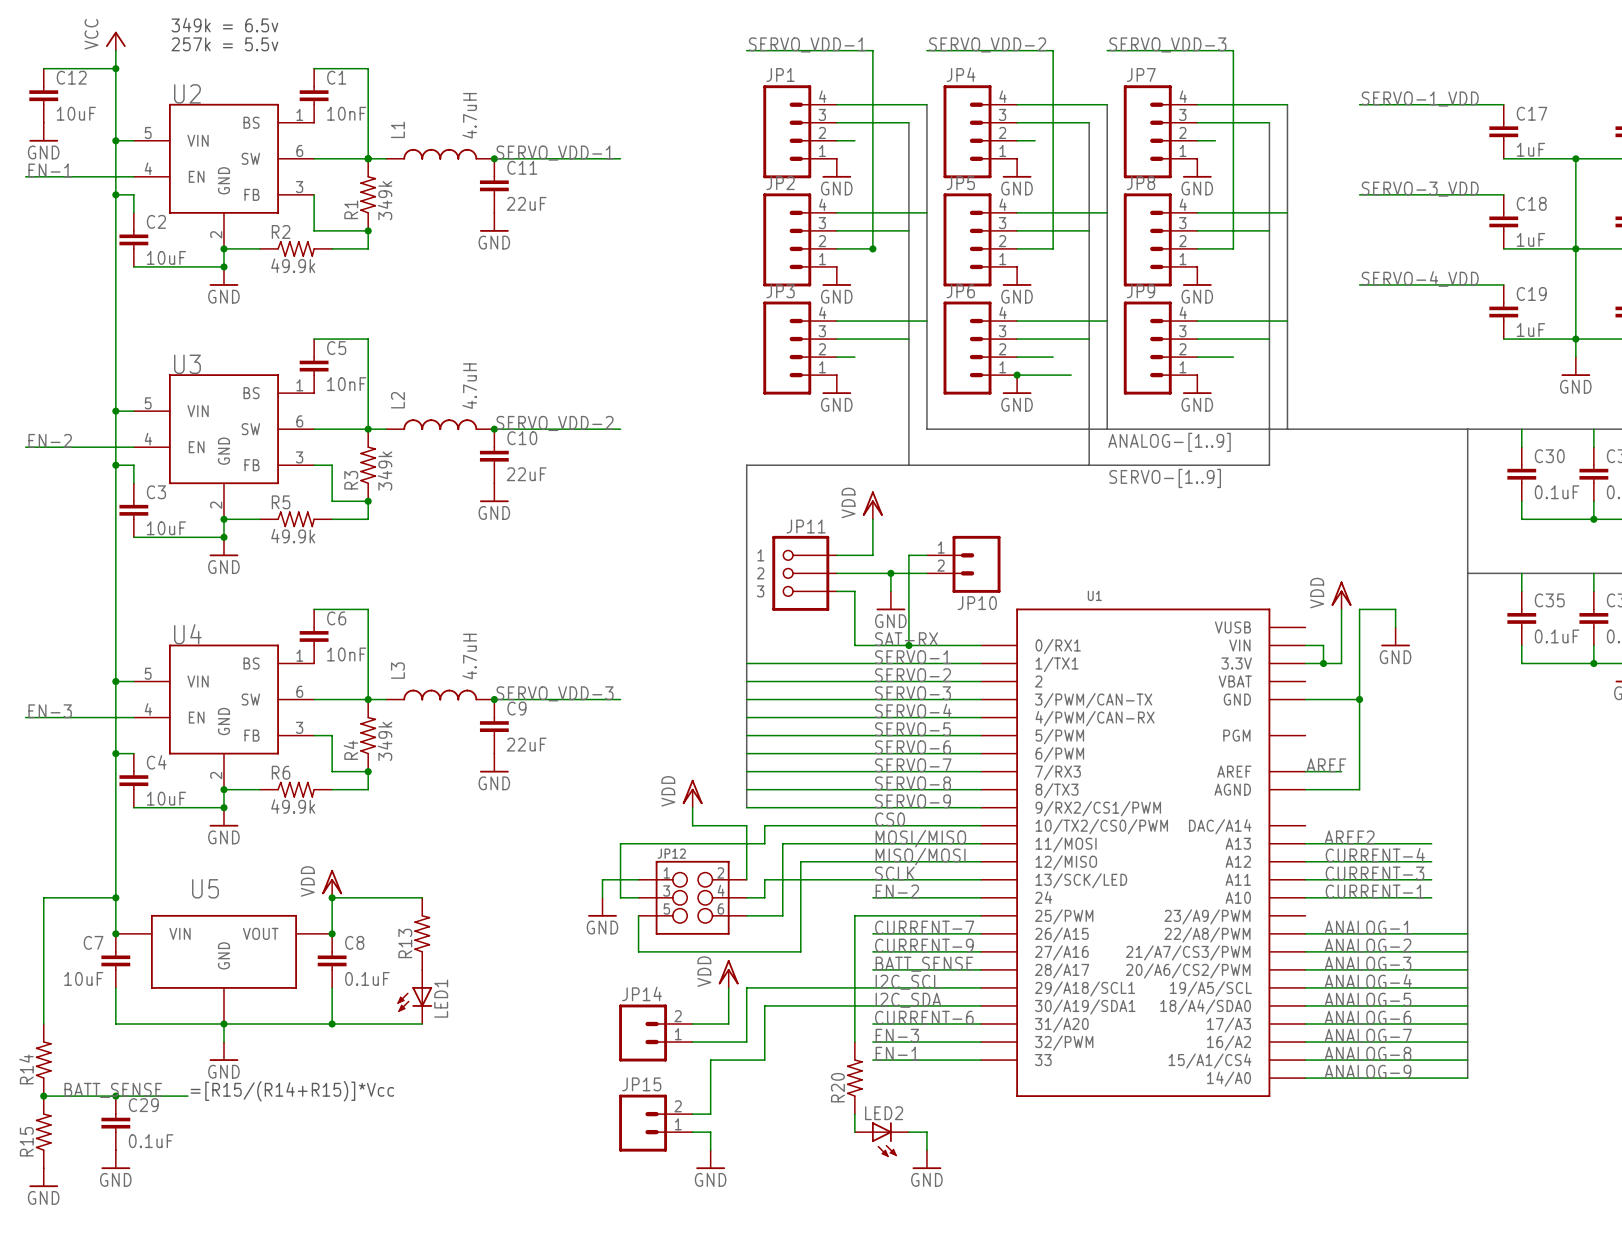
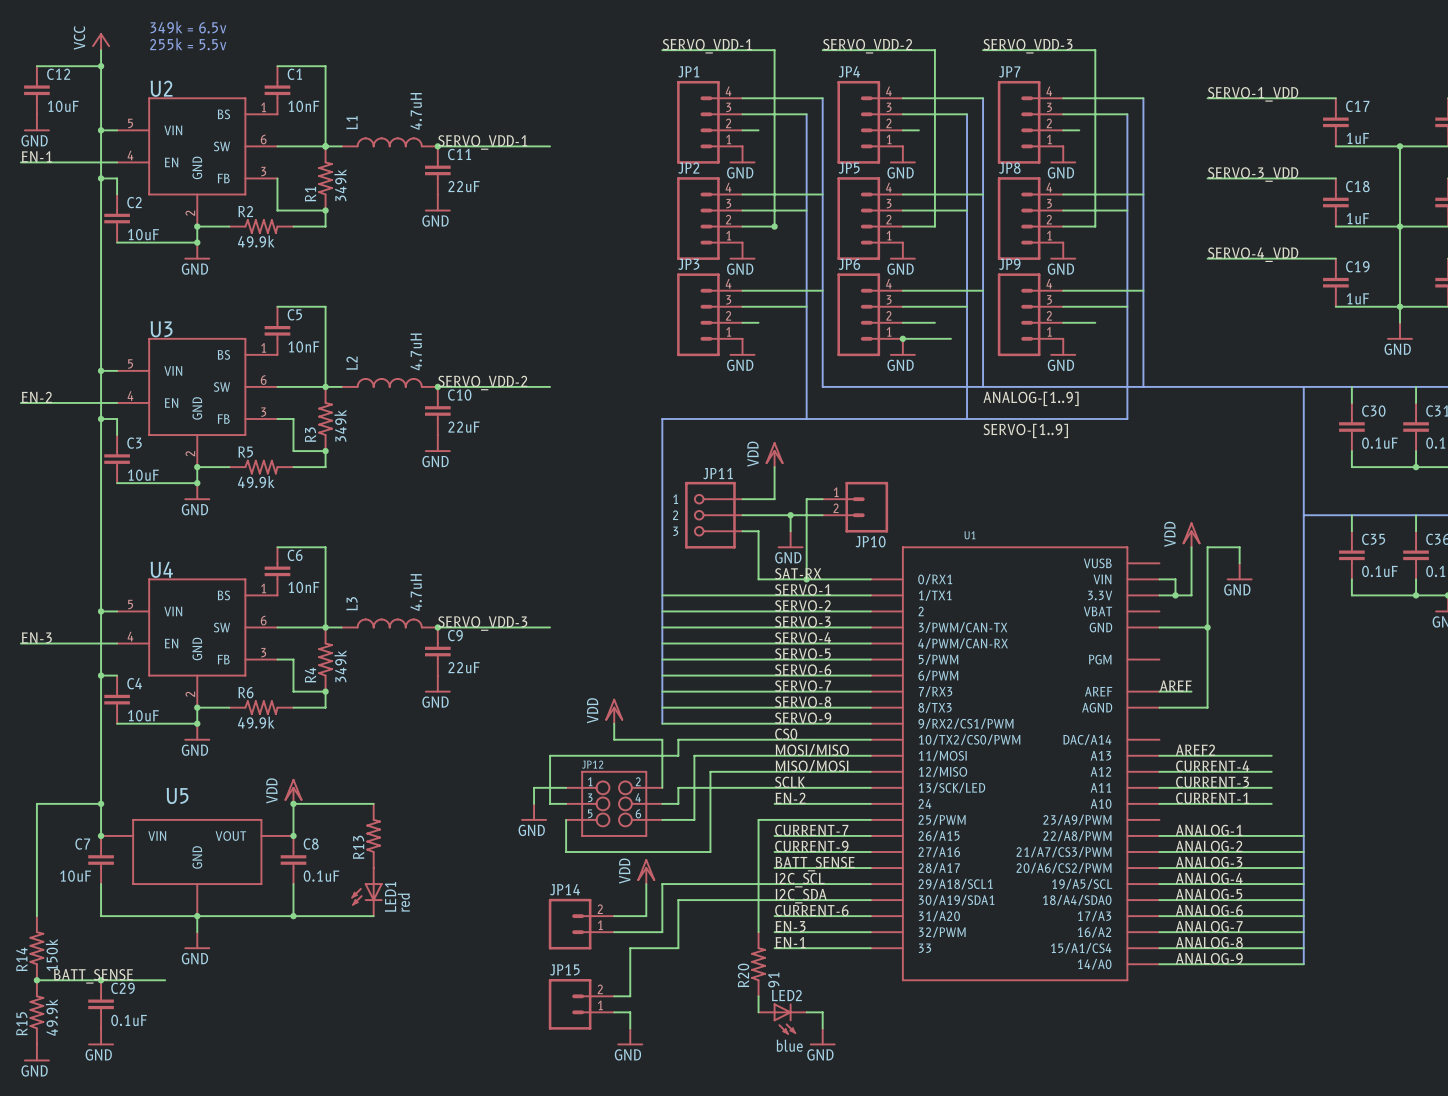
text: 257k = 5.5v (224, 44) -> 255k = 5.5v (188, 44)
LED1 value: none -> red (403, 902)
R14 value: none -> 150k (51, 954)
text: =[R15/(R14+R15)]*Vcc (292, 1091) -> none
R20 value: none -> 91 (773, 980)
R15 value: none -> 49.9k (51, 1017)
LED2 value: none -> blue (789, 1045)

